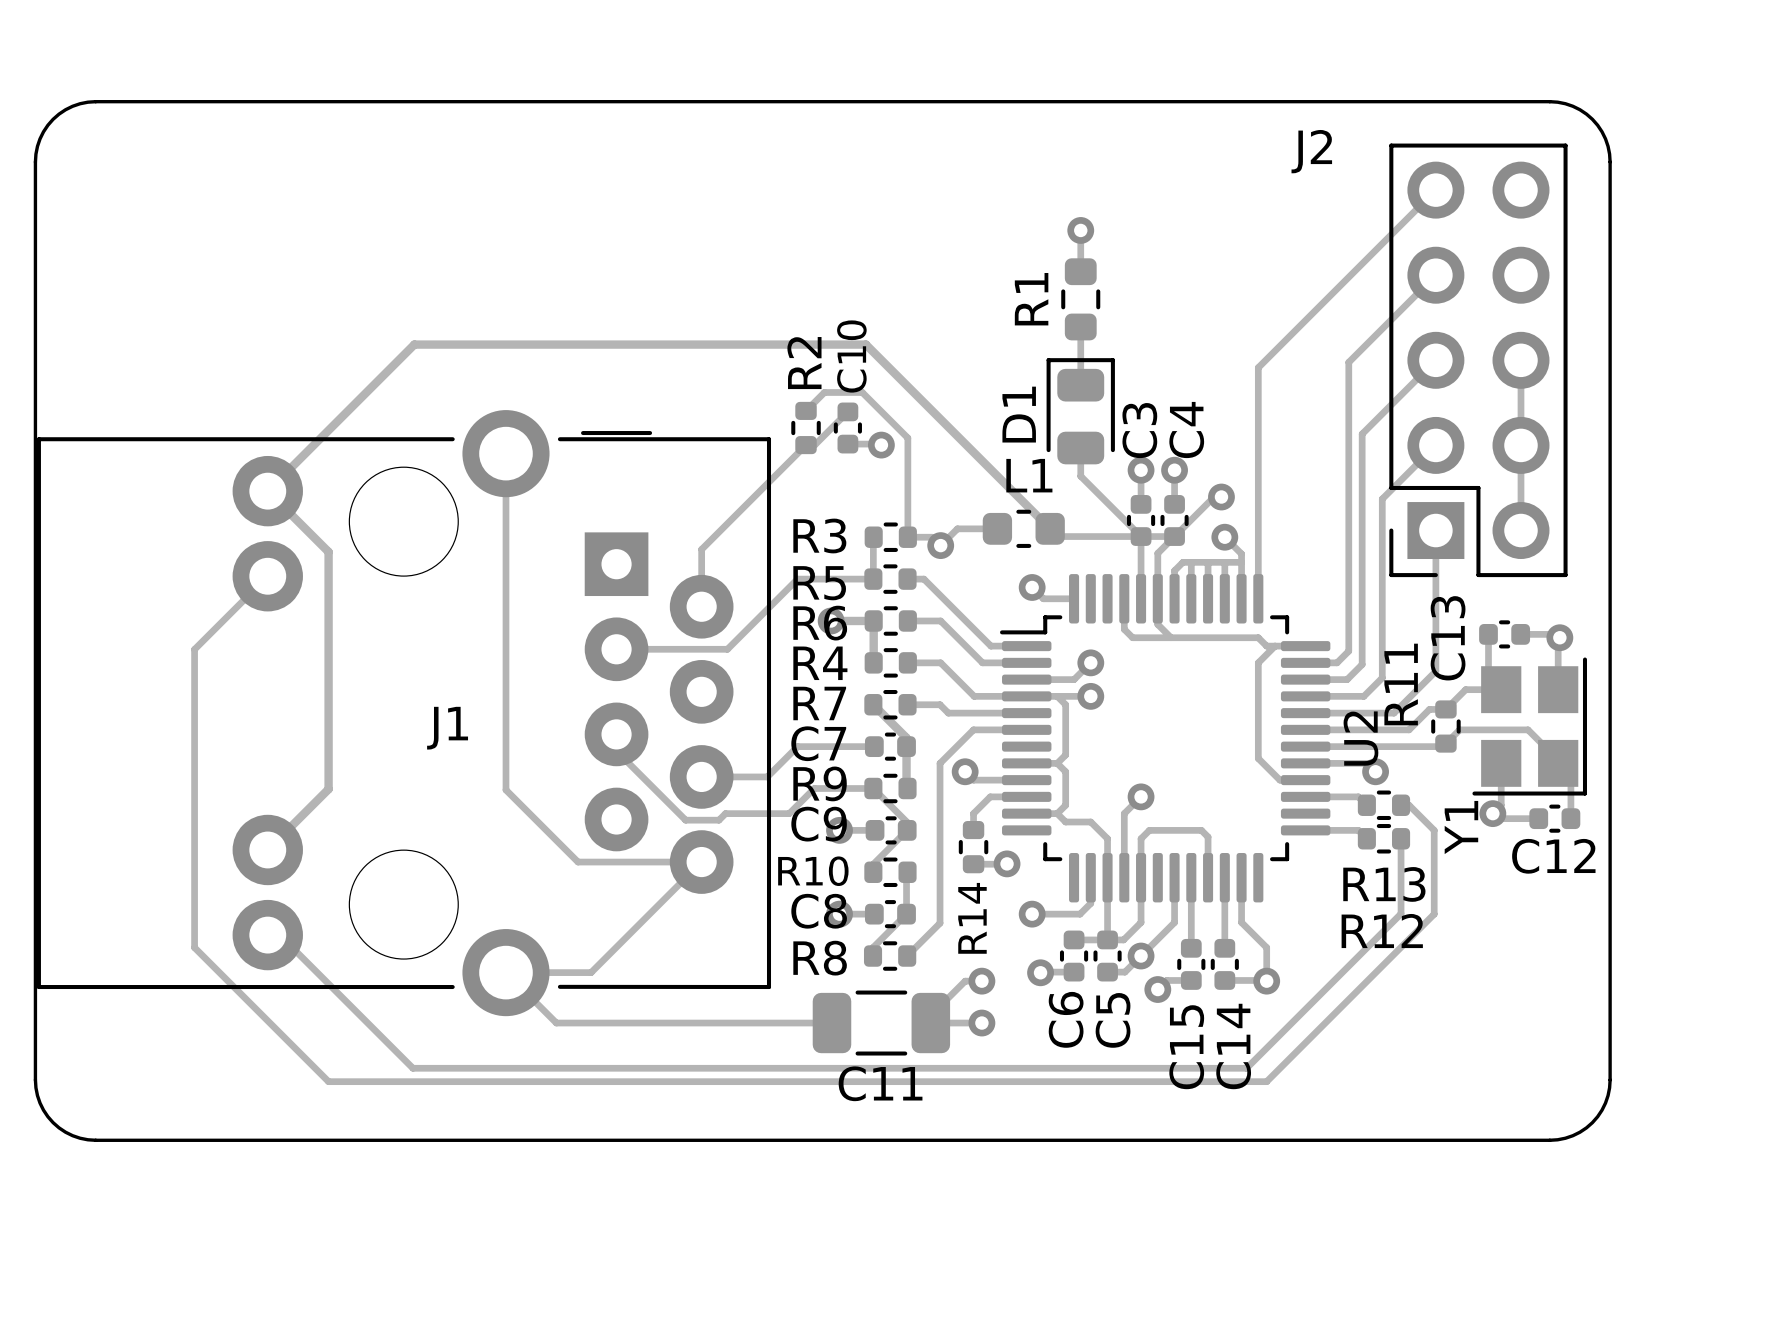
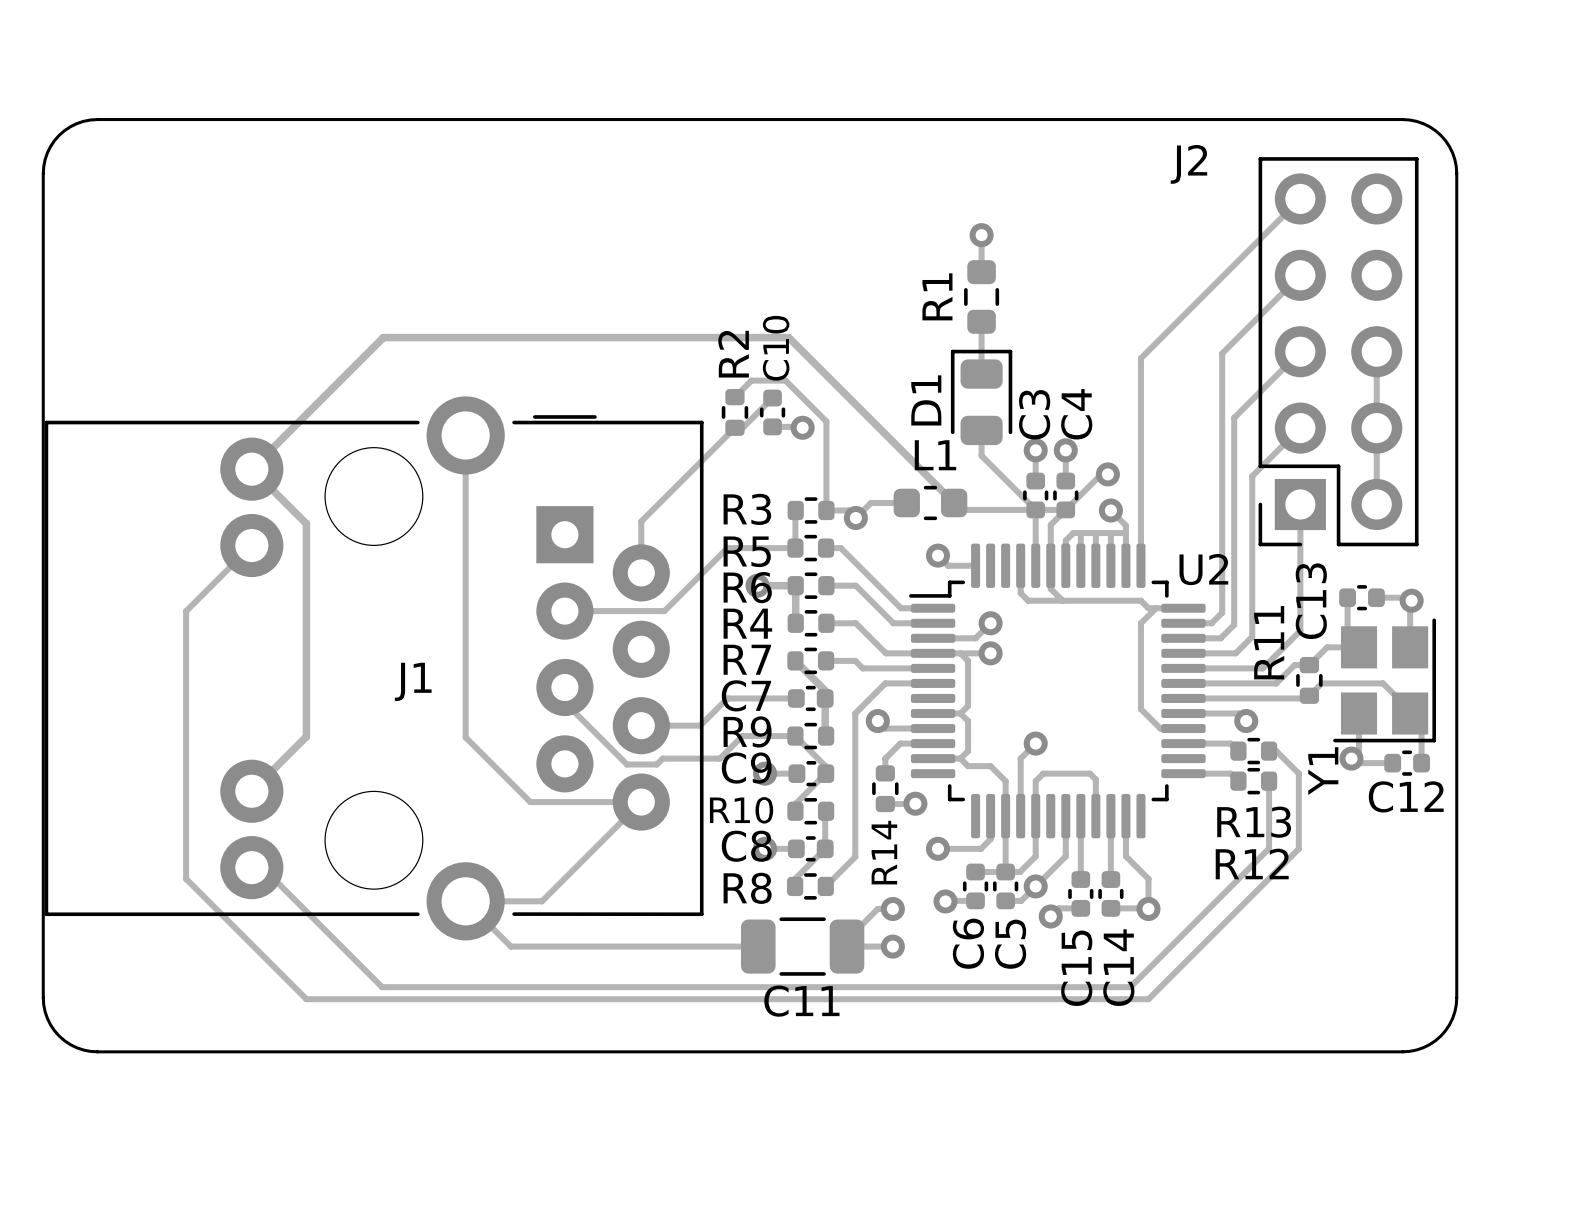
U2 name rotation: 0° (1360, 738) -> 90° clockwise (1203, 569)
U2 name position: U2 (1360, 738) -> U2 (1203, 569)

